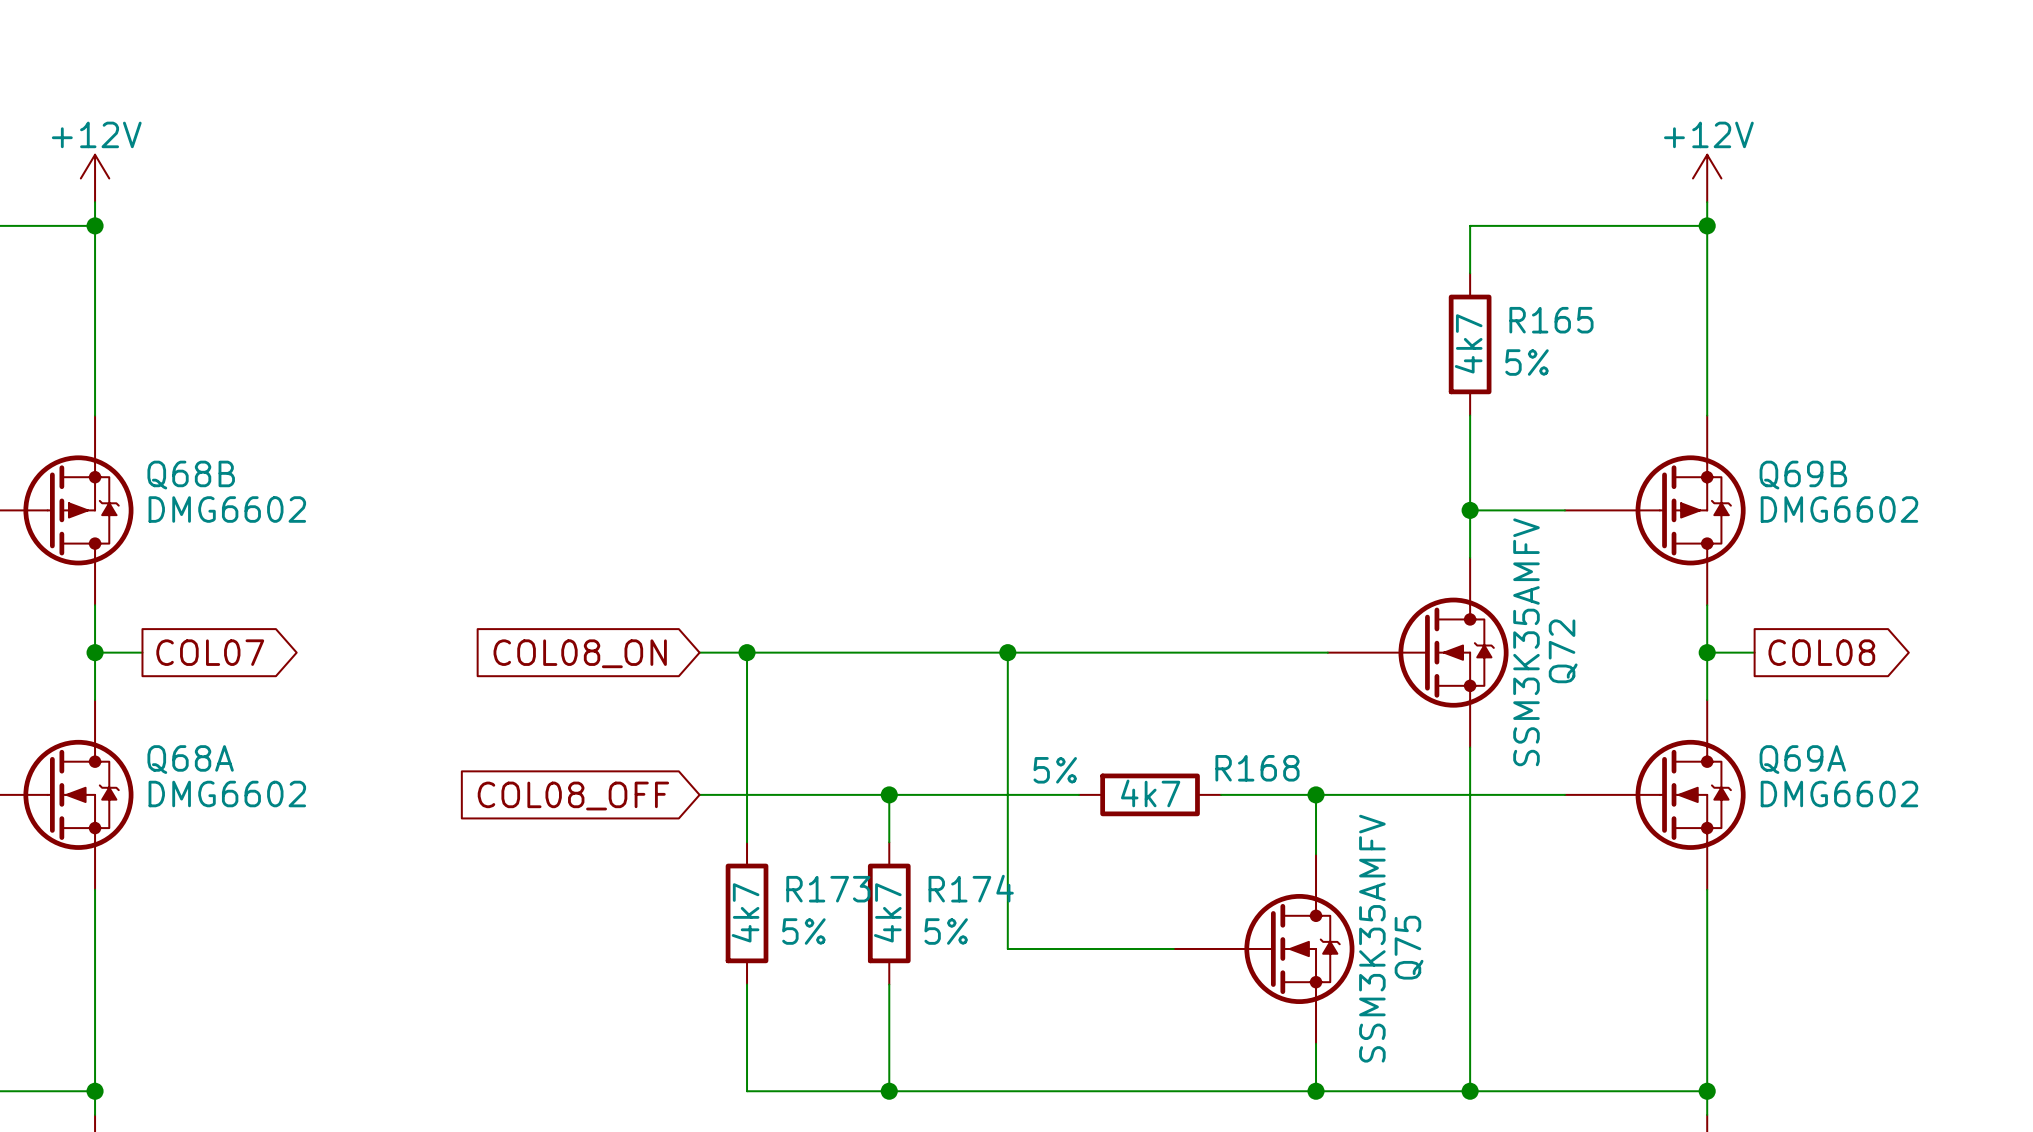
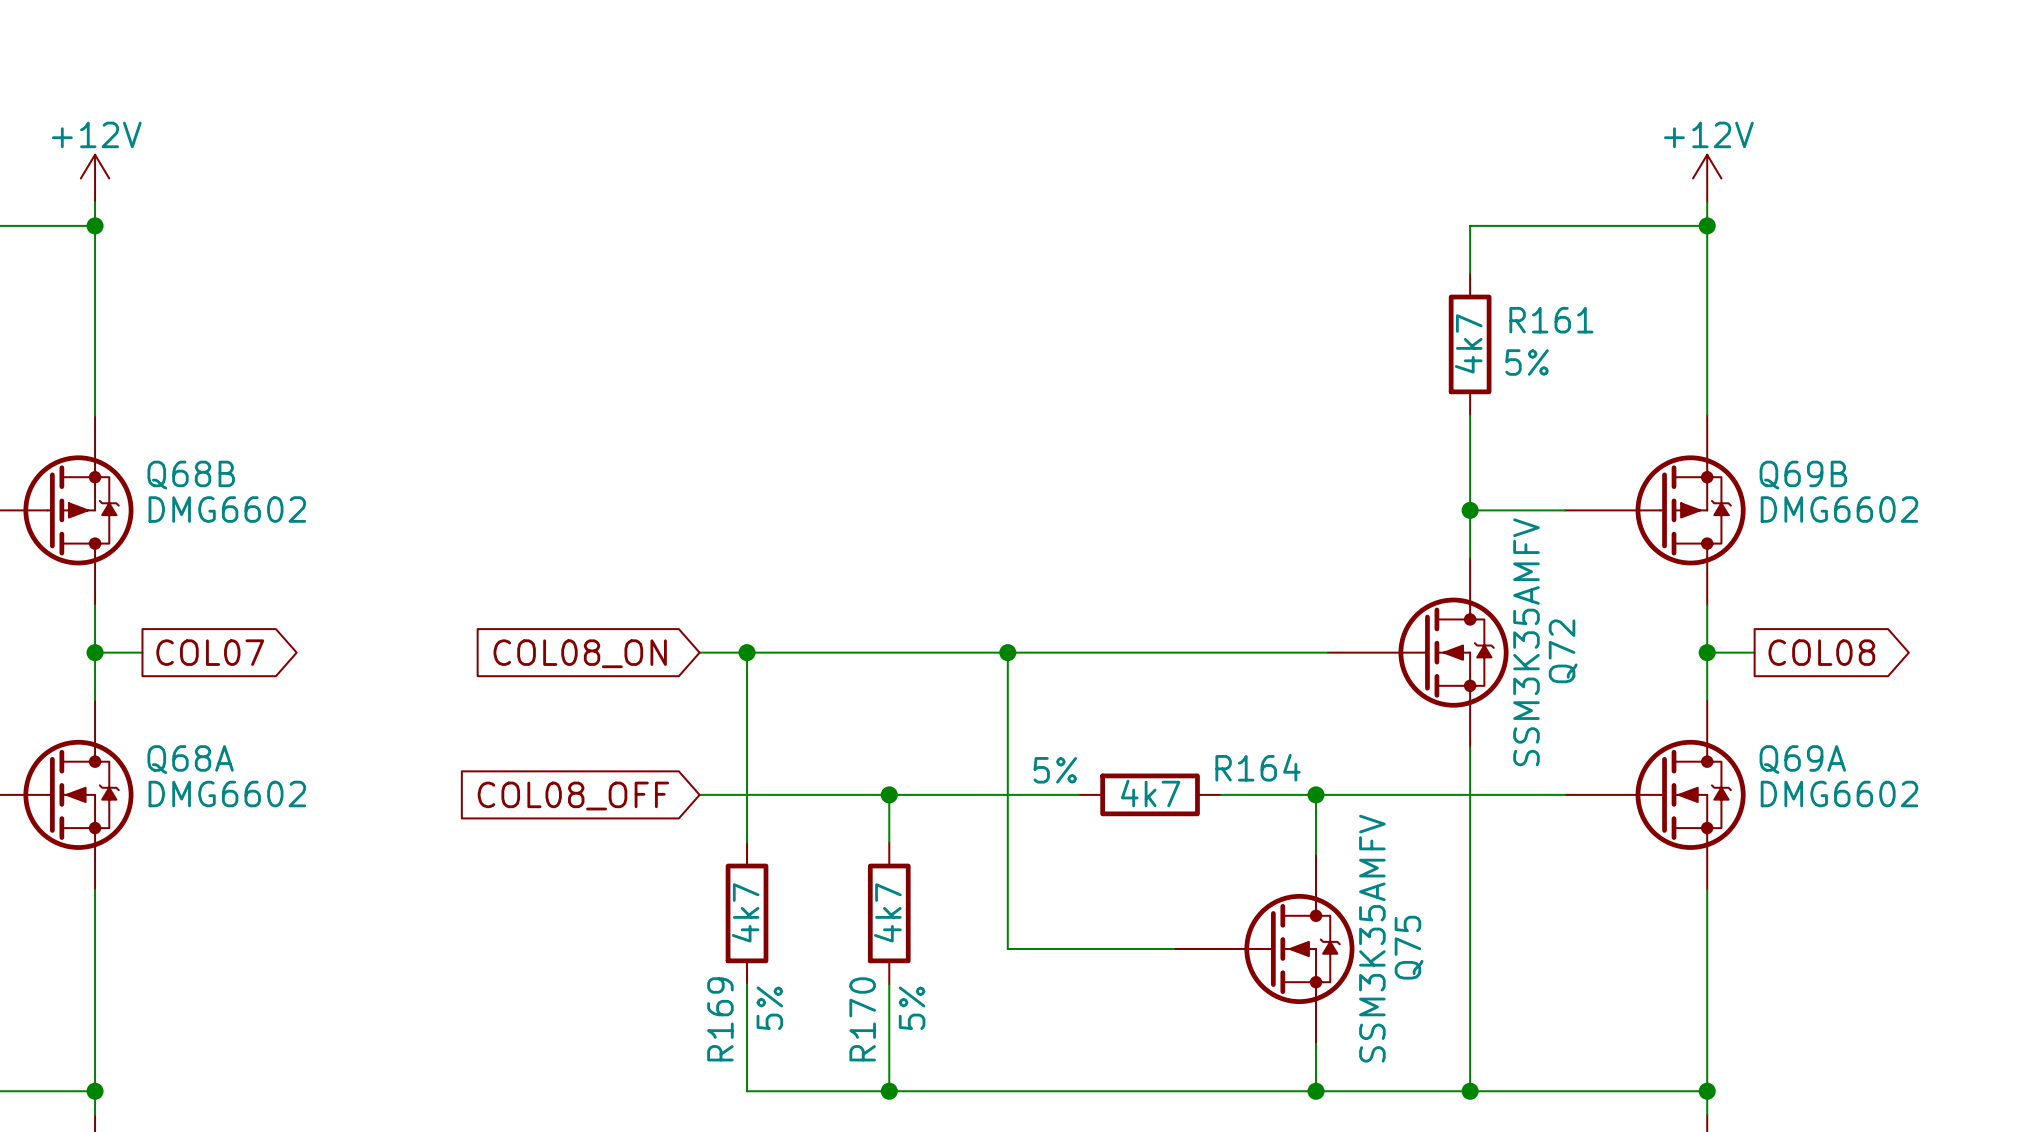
R165 name: R165 (1551, 320) -> R161 (1551, 320)
R168 name: R168 (1257, 768) -> R164 (1258, 767)
R174 name: R174 (971, 888) -> R170 (862, 1019)
R173 name: R173 (828, 889) -> R169 (720, 1019)
R173 text rotation: 0° (803, 931) -> 90° counterclockwise (769, 1008)
R173 text position: 5% (803, 931) -> 5% (769, 1008)
R174 text rotation: 0° (946, 931) -> 90° counterclockwise (912, 1008)
R174 text position: 5% (946, 931) -> 5% (912, 1008)

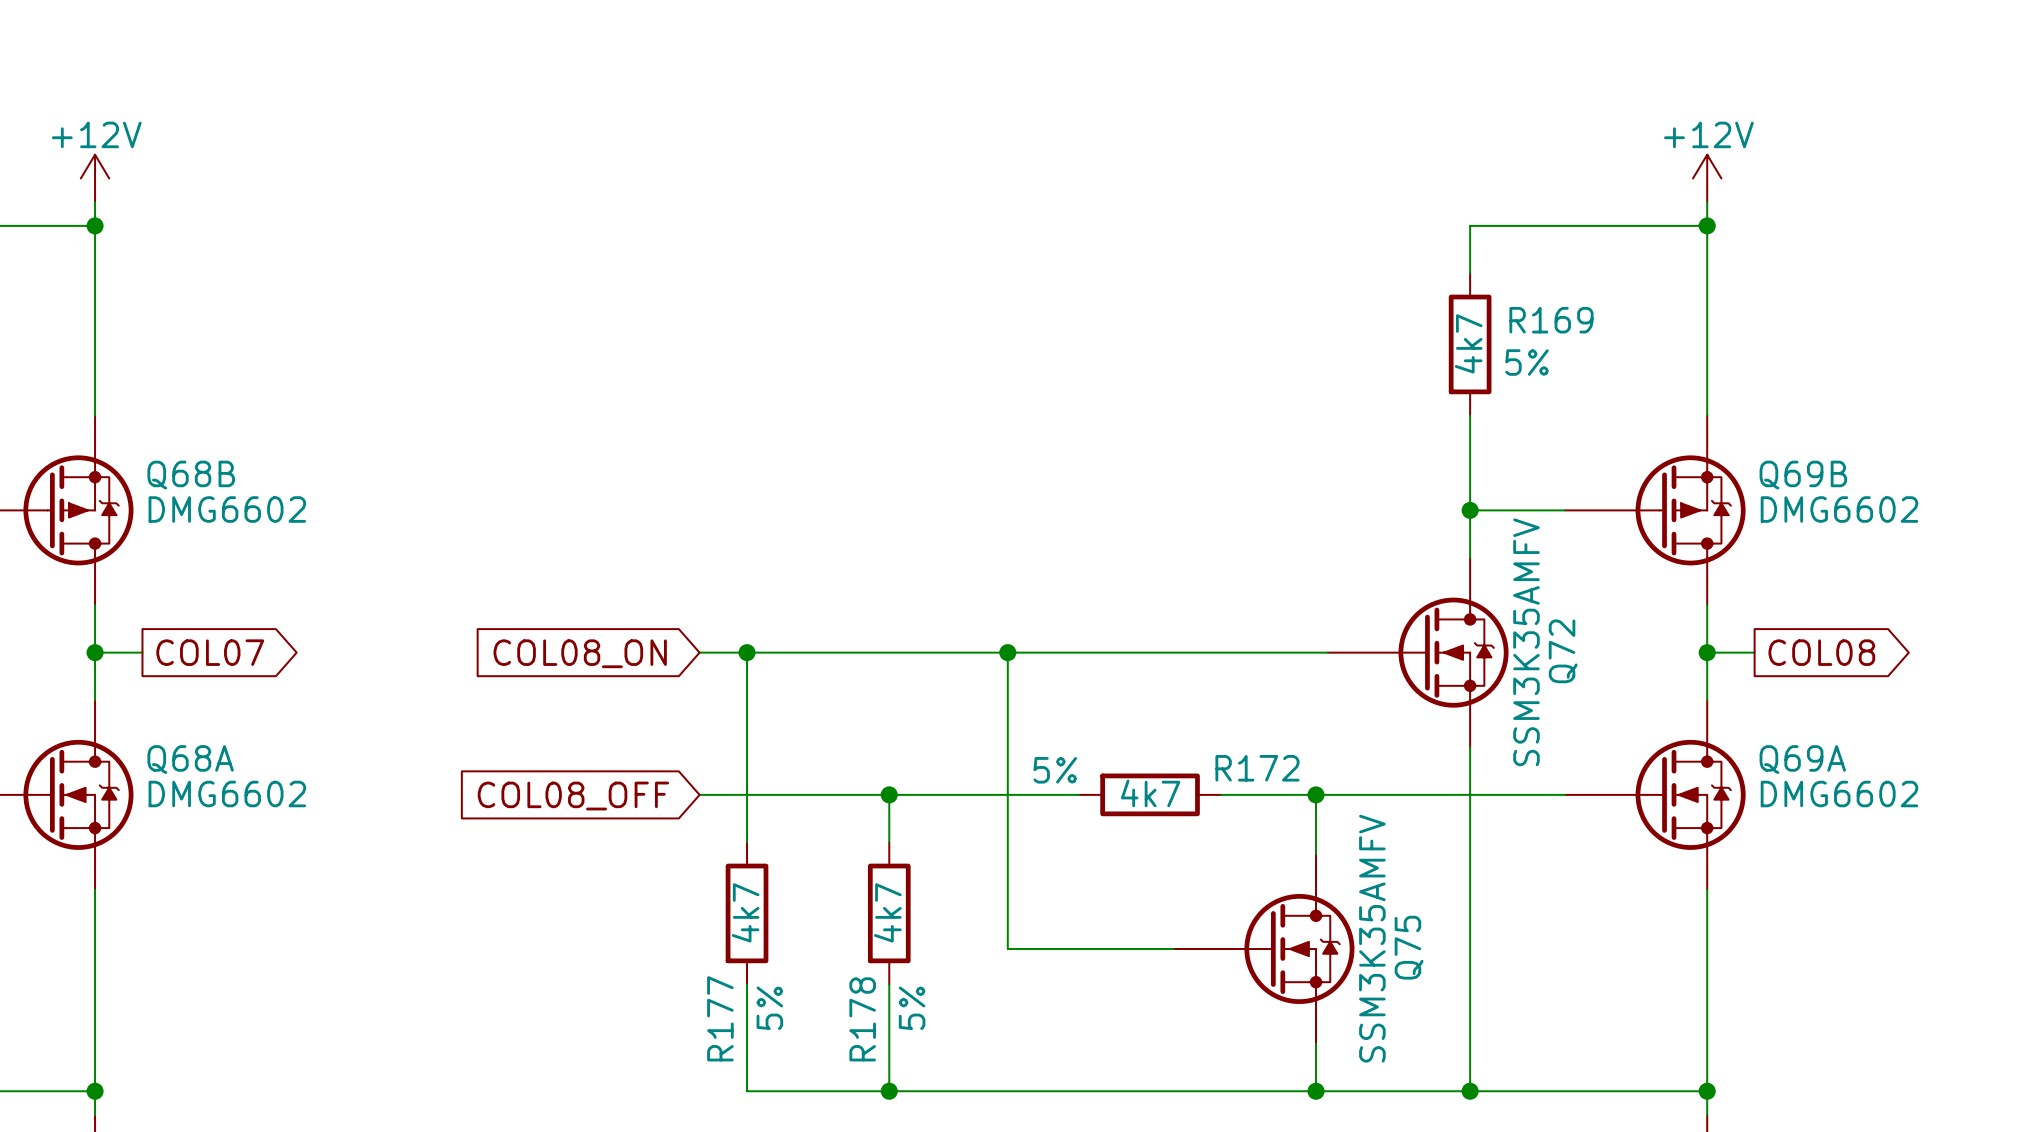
R161 name: R161 (1551, 320) -> R169 (1551, 320)
R164 name: R164 (1258, 767) -> R172 (1257, 768)
R169 name: R169 (720, 1019) -> R177 (720, 1018)
R170 name: R170 (862, 1019) -> R178 (862, 1019)

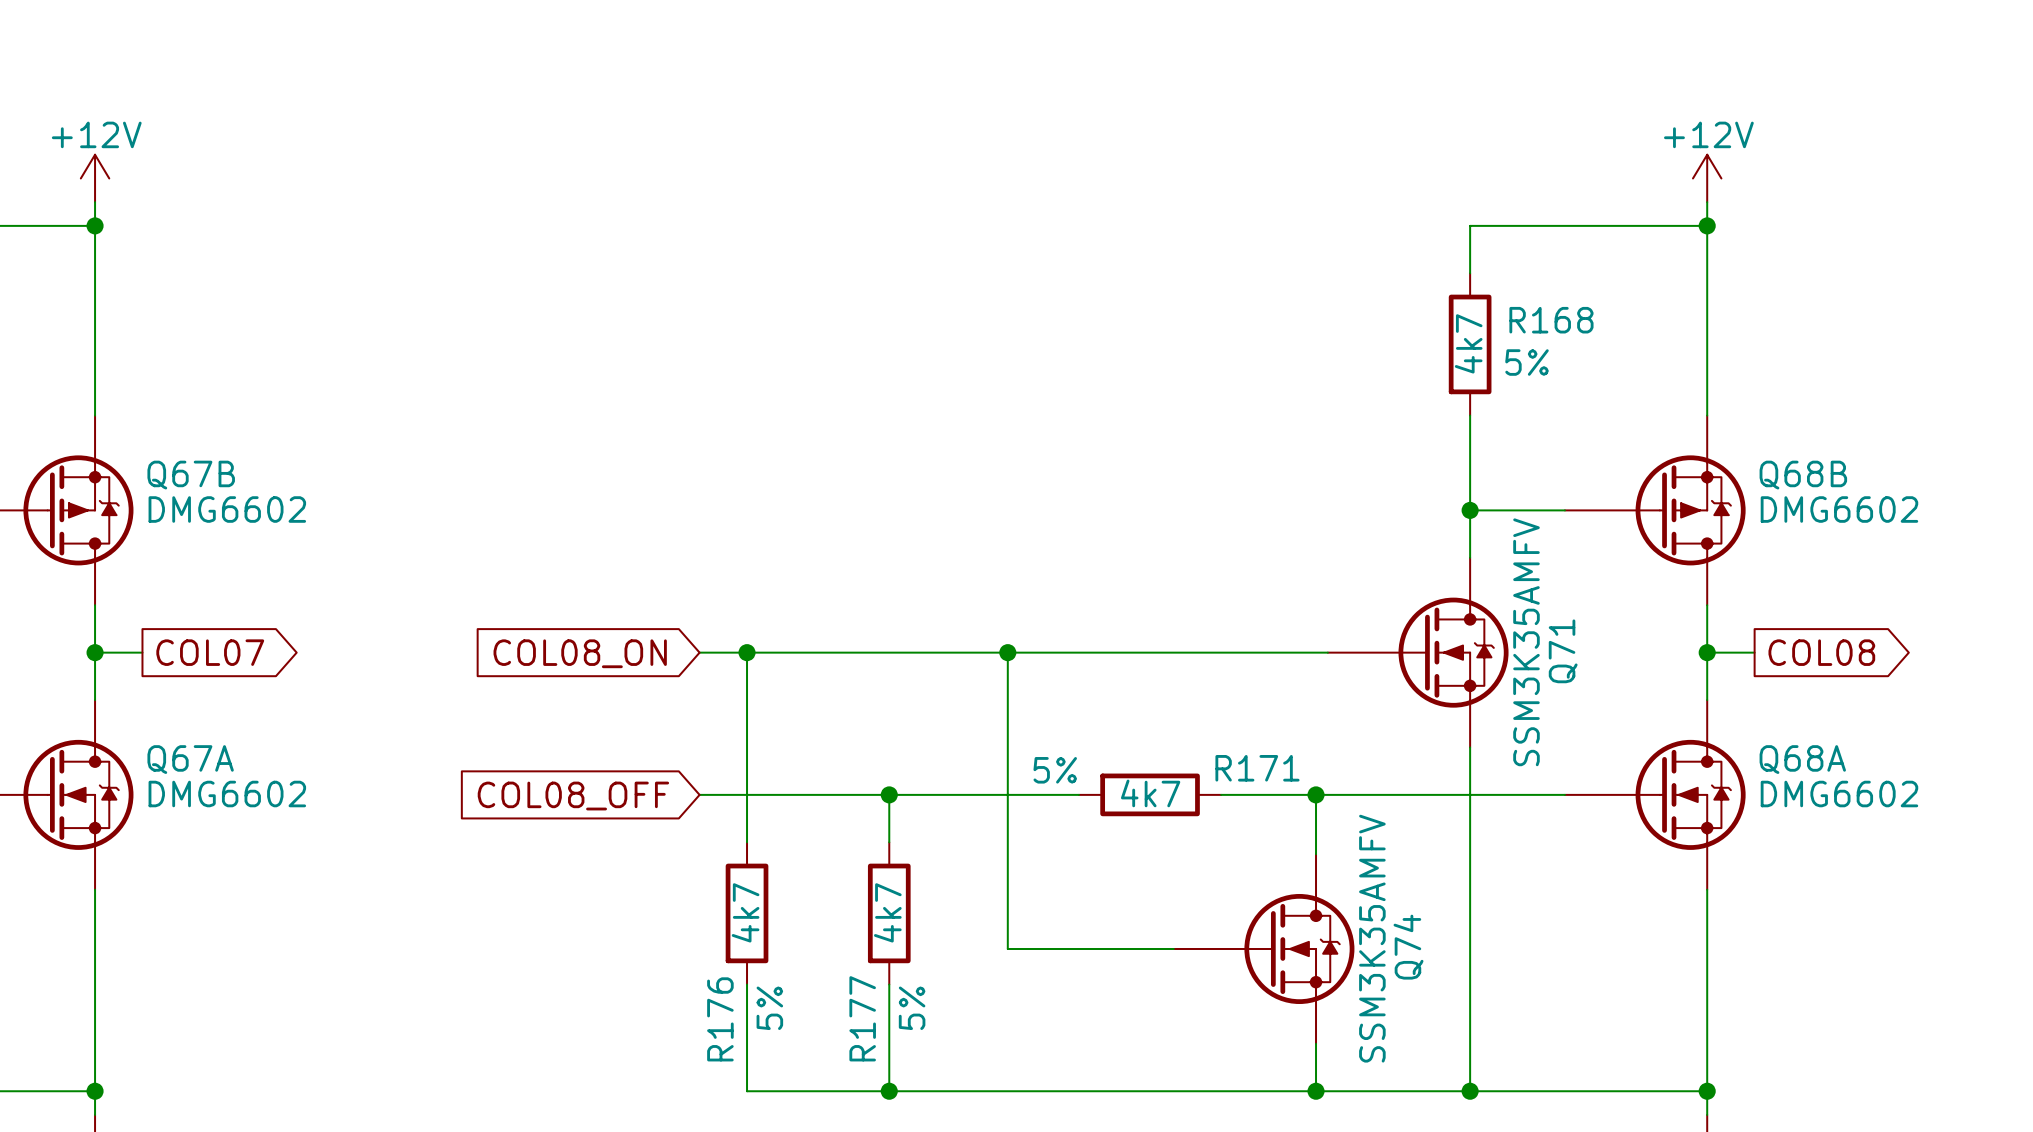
R169 name: R169 (1551, 320) -> R168 (1551, 320)
Q68B name: Q68B (191, 475) -> Q67B (191, 475)
Q69B name: Q69B (1803, 475) -> Q68B (1803, 475)
Q72 name: Q72 (1563, 651) -> Q71 (1563, 651)
Q68A name: Q68A (190, 759) -> Q67A (190, 759)
Q69A name: Q69A (1802, 759) -> Q68A (1802, 759)
R172 name: R172 (1257, 768) -> R171 (1257, 768)
Q75 name: Q75 (1409, 947) -> Q74 (1408, 947)
R177 name: R177 (720, 1018) -> R176 (720, 1019)
R178 name: R178 (862, 1019) -> R177 (862, 1018)

